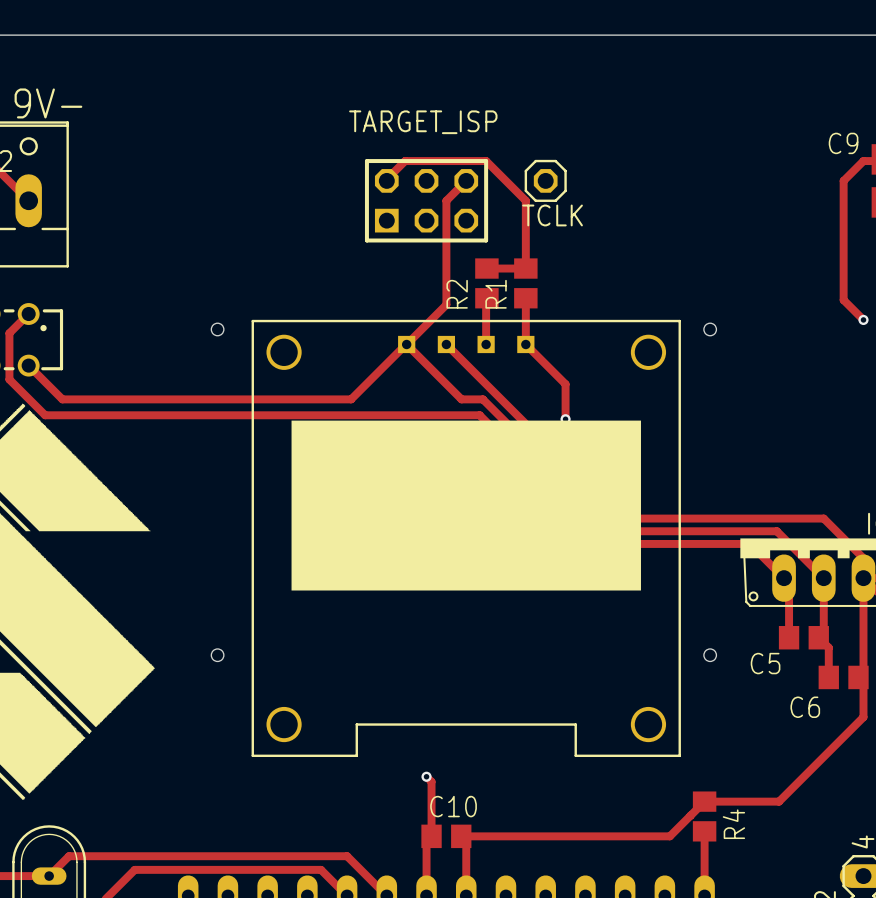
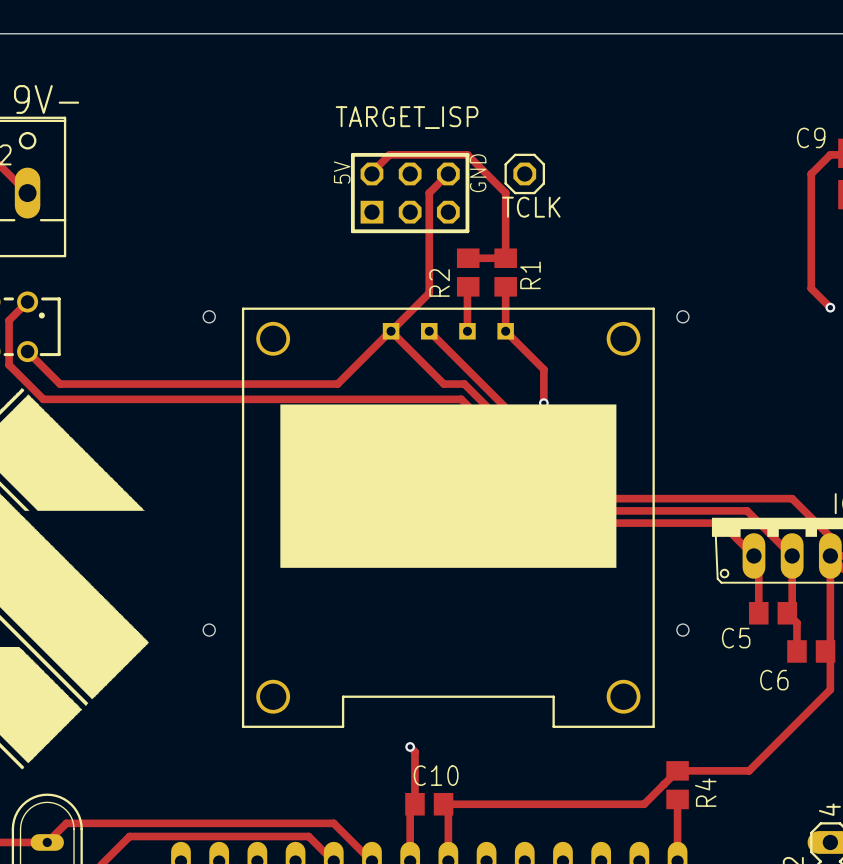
text: none -> 5V (342, 172)
text: none -> GND (478, 173)
R1 name position: R1 (496, 294) -> R1 (530, 275)

